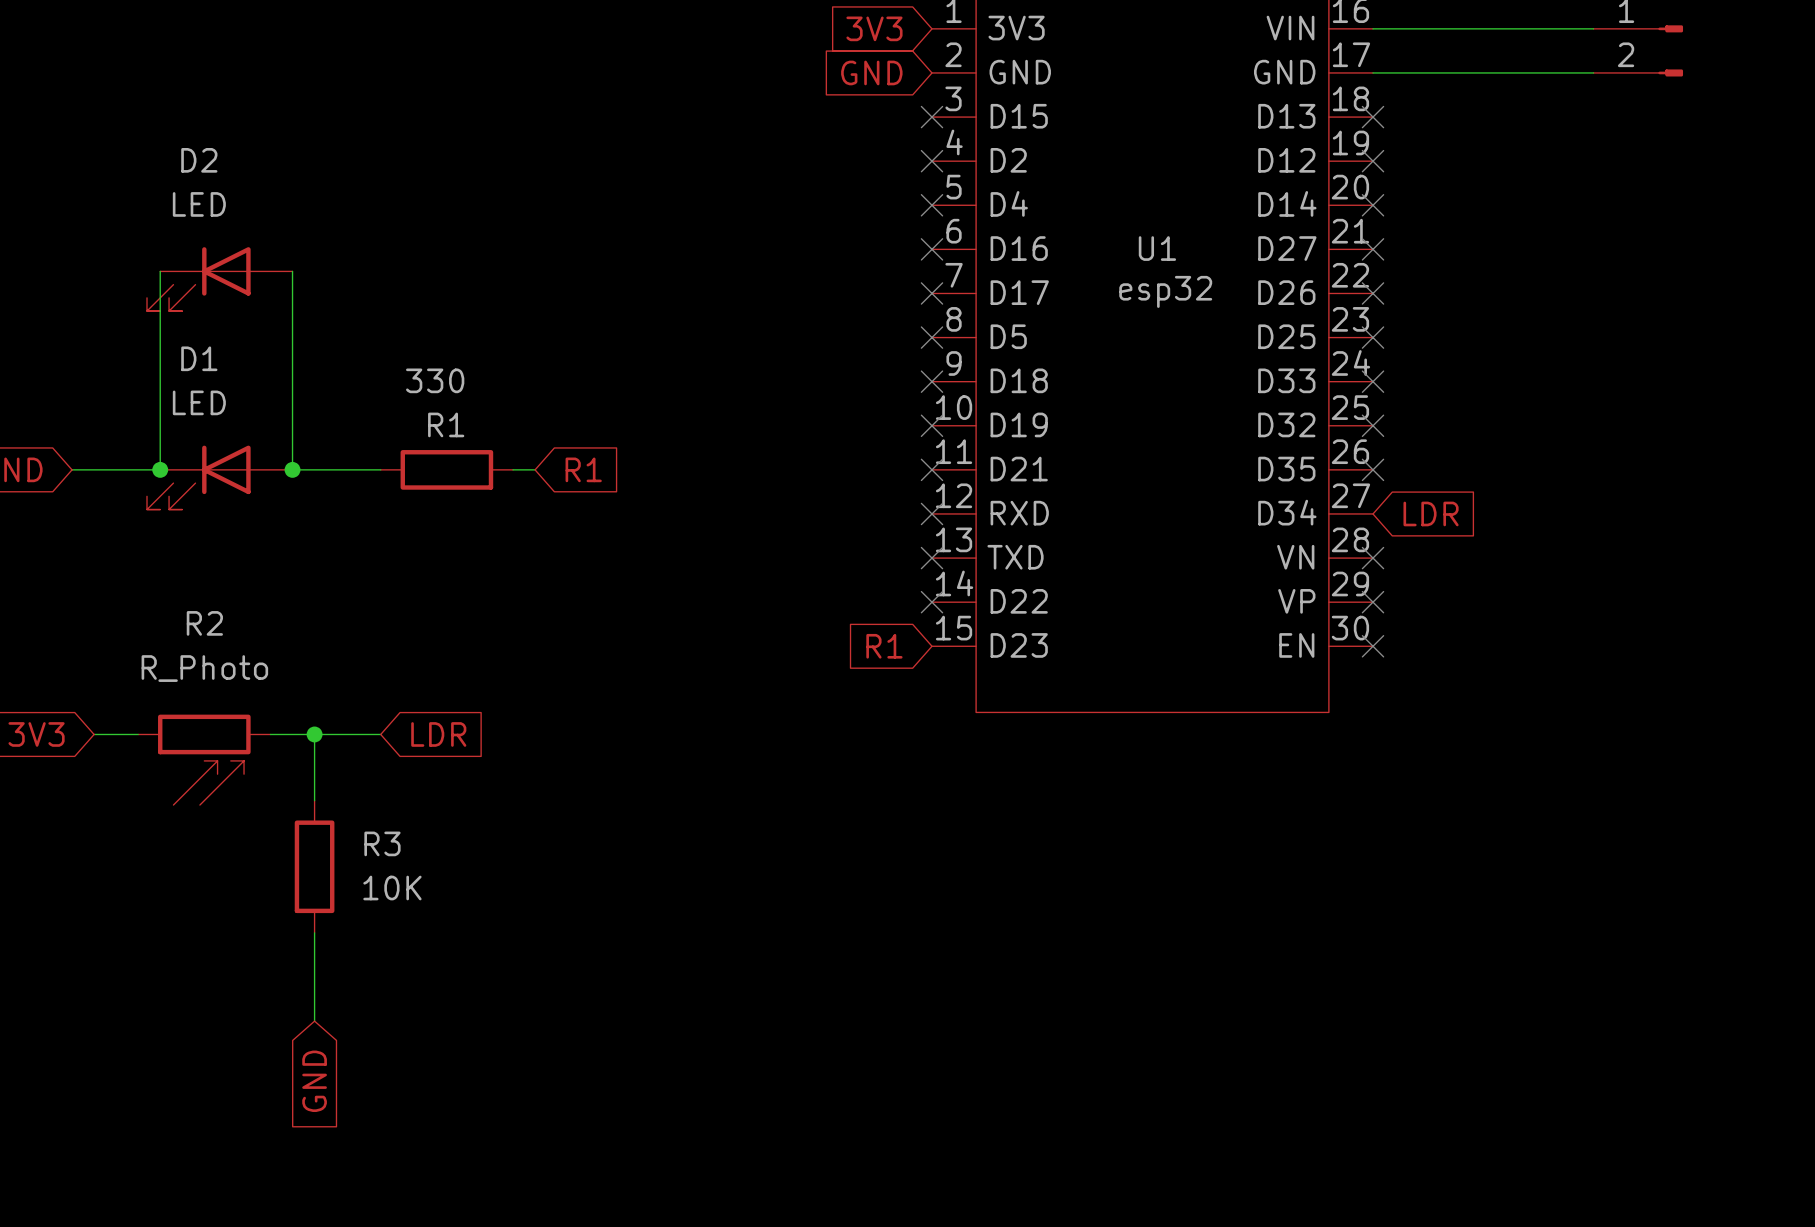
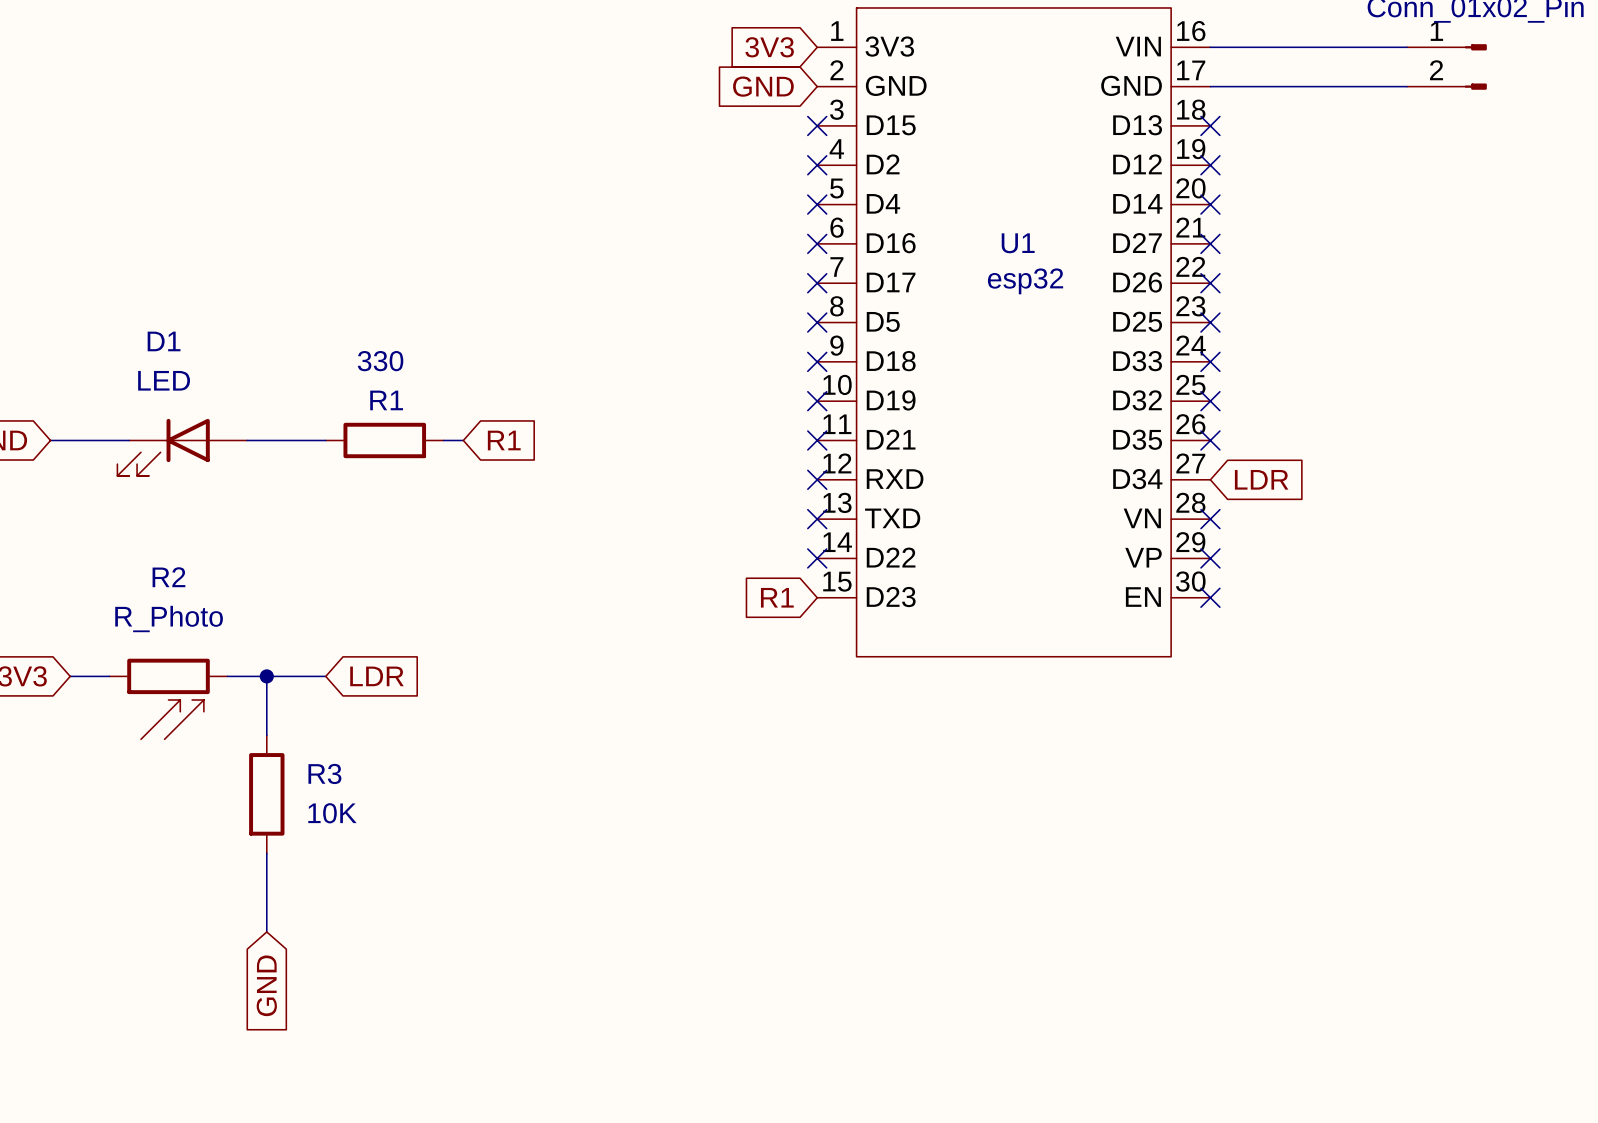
wire: (160, 271) (160, 469) -> none
wire: (292, 271) (292, 469) -> none
D2: LED (219, 279) -> none
junction: (160, 469) -> none
junction: (292, 469) -> none

